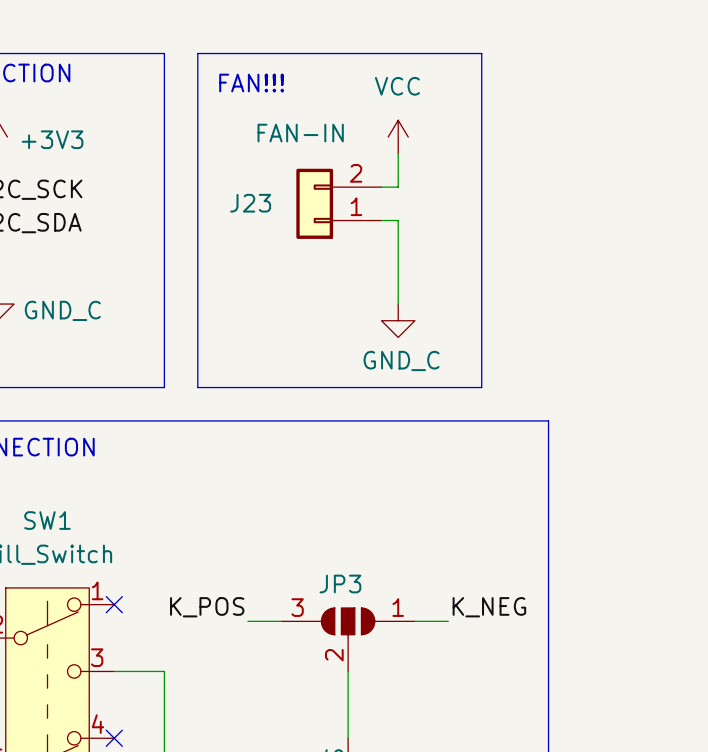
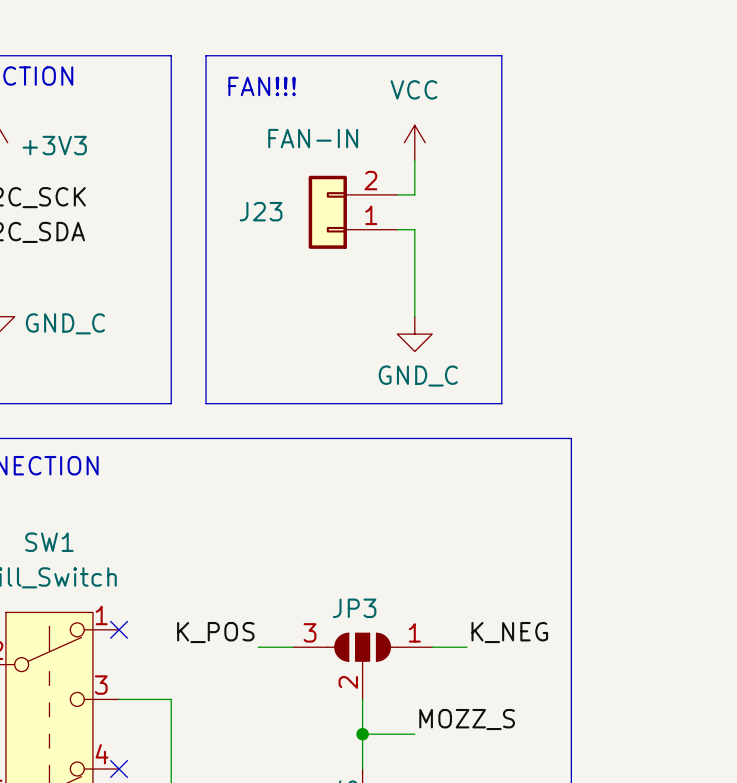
label: none -> MOZZ_S (467, 719)
wire: none -> (362, 734) (414, 734)
junction: none -> (362, 734)

